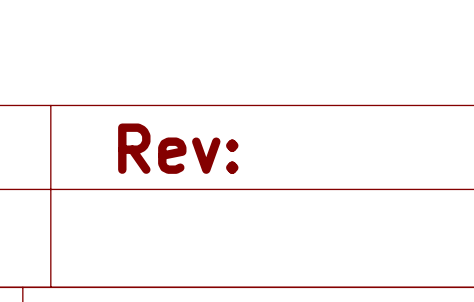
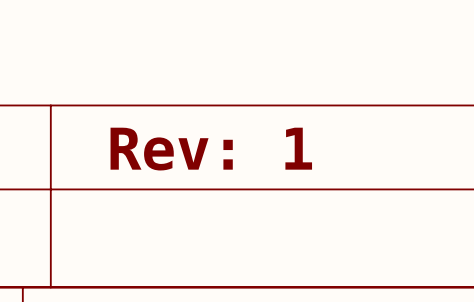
title block: Rev: (178, 148) -> Rev: 1 (211, 149)

